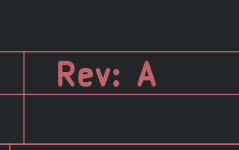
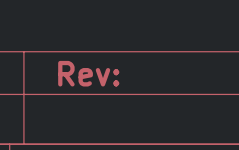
title block: Rev: A (107, 73) -> Rev: (88, 73)

